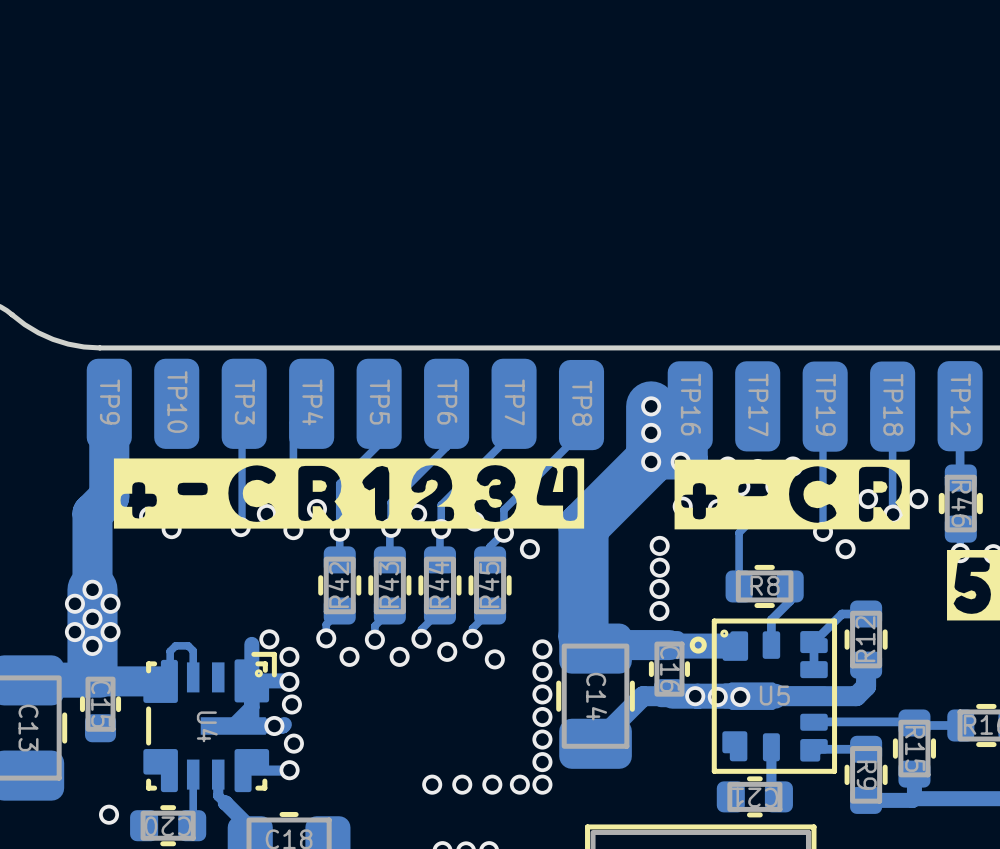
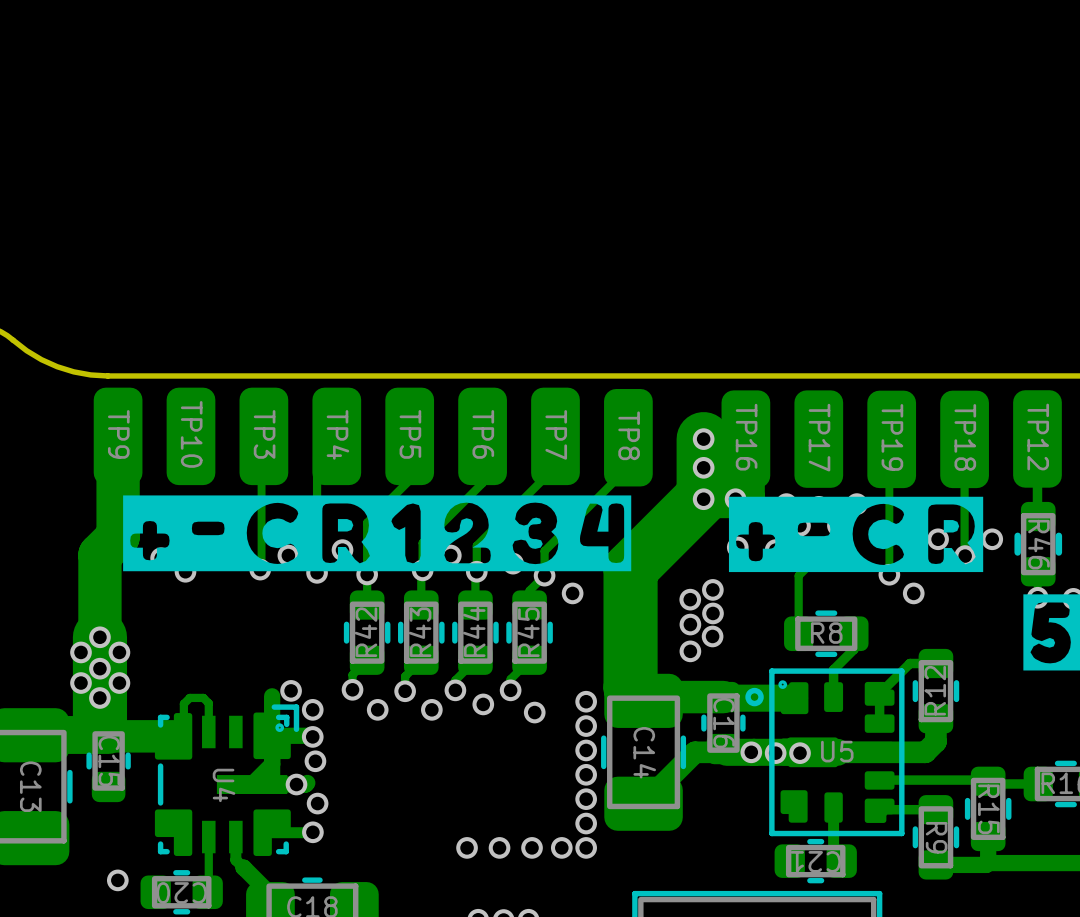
via: none -> (690, 599)
via: none -> (690, 624)
via: none -> (690, 651)
via: (659, 611) -> none

